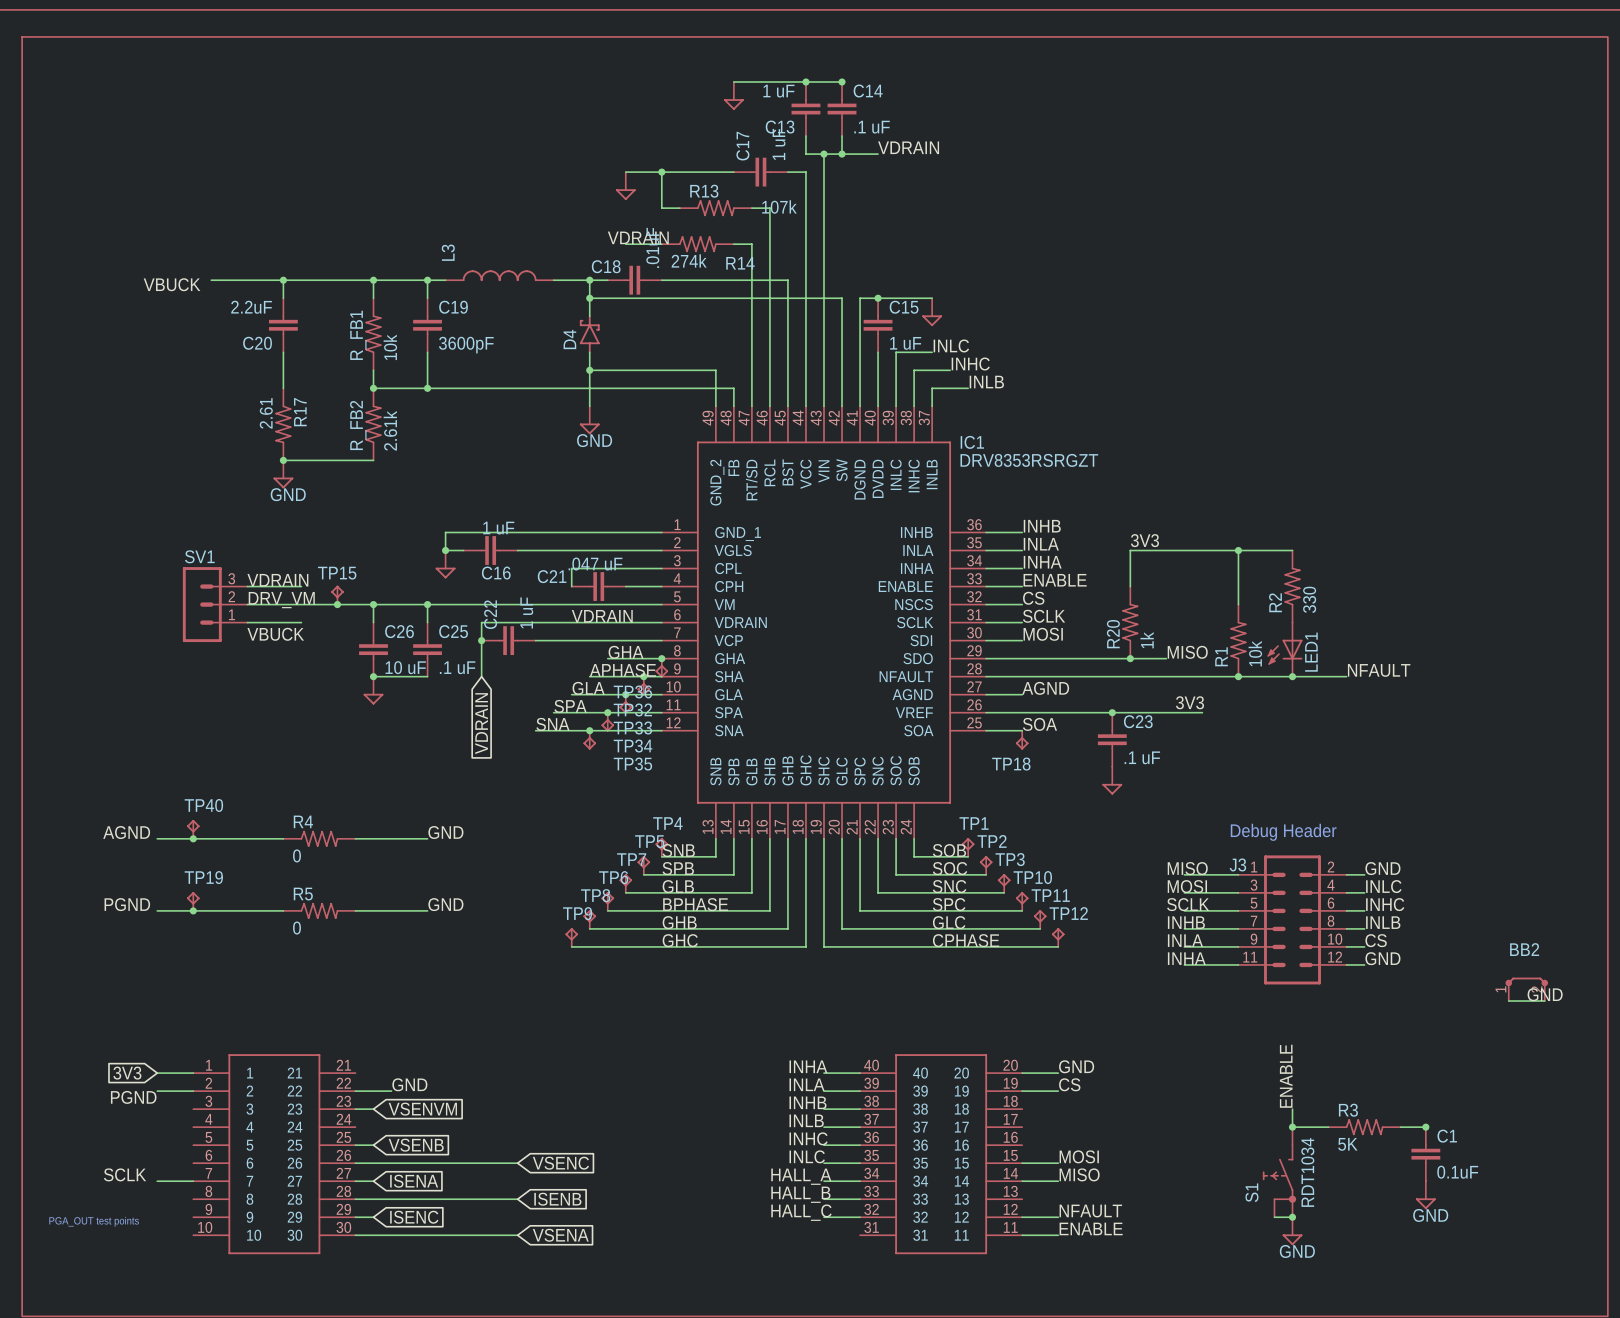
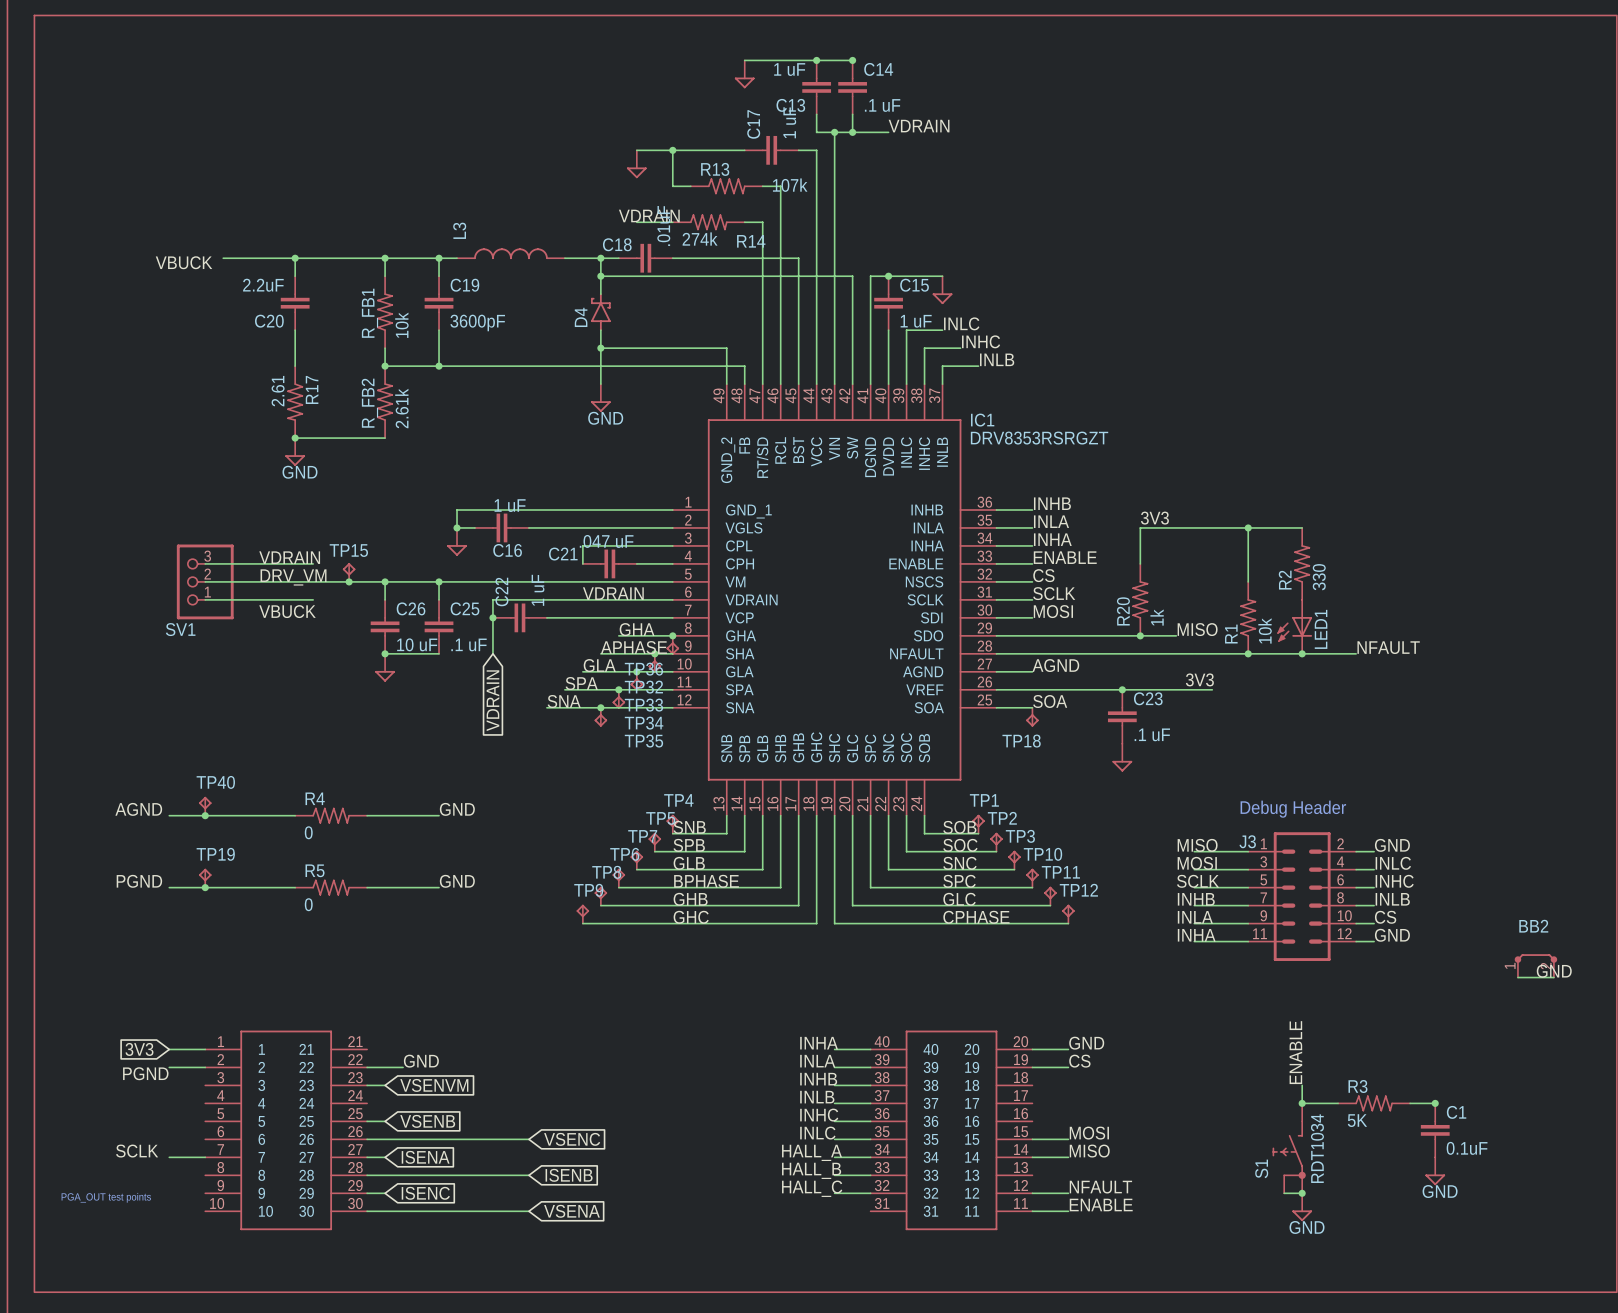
SV1 name position: SV1 (199, 556) -> SV1 (180, 629)
SV1 symbol: [182, 567, 248, 643] -> [176, 544, 234, 620]

